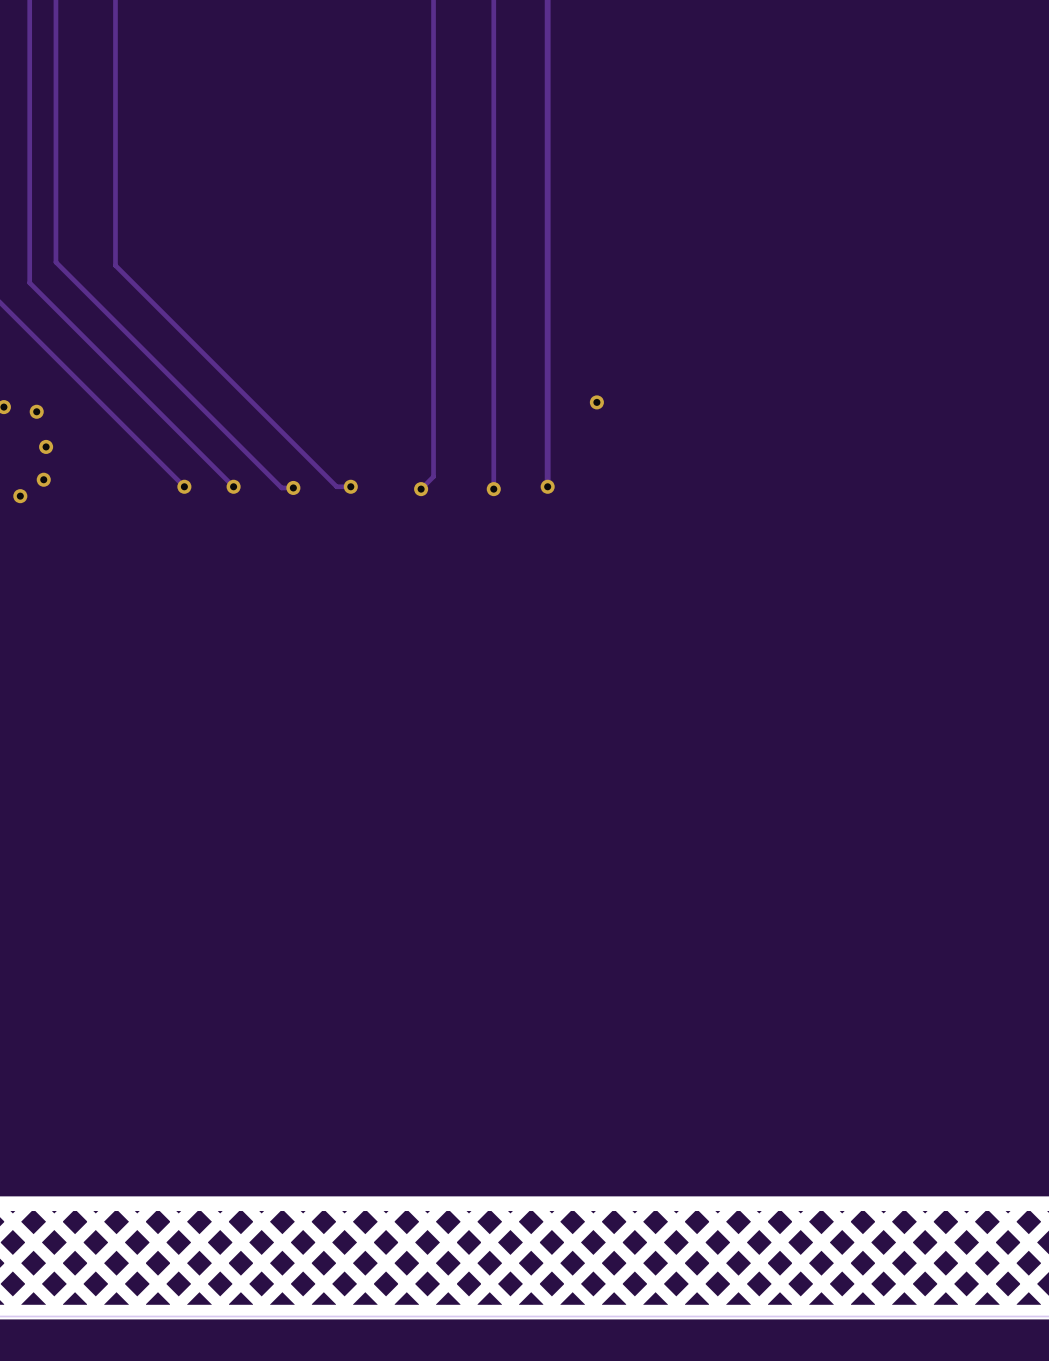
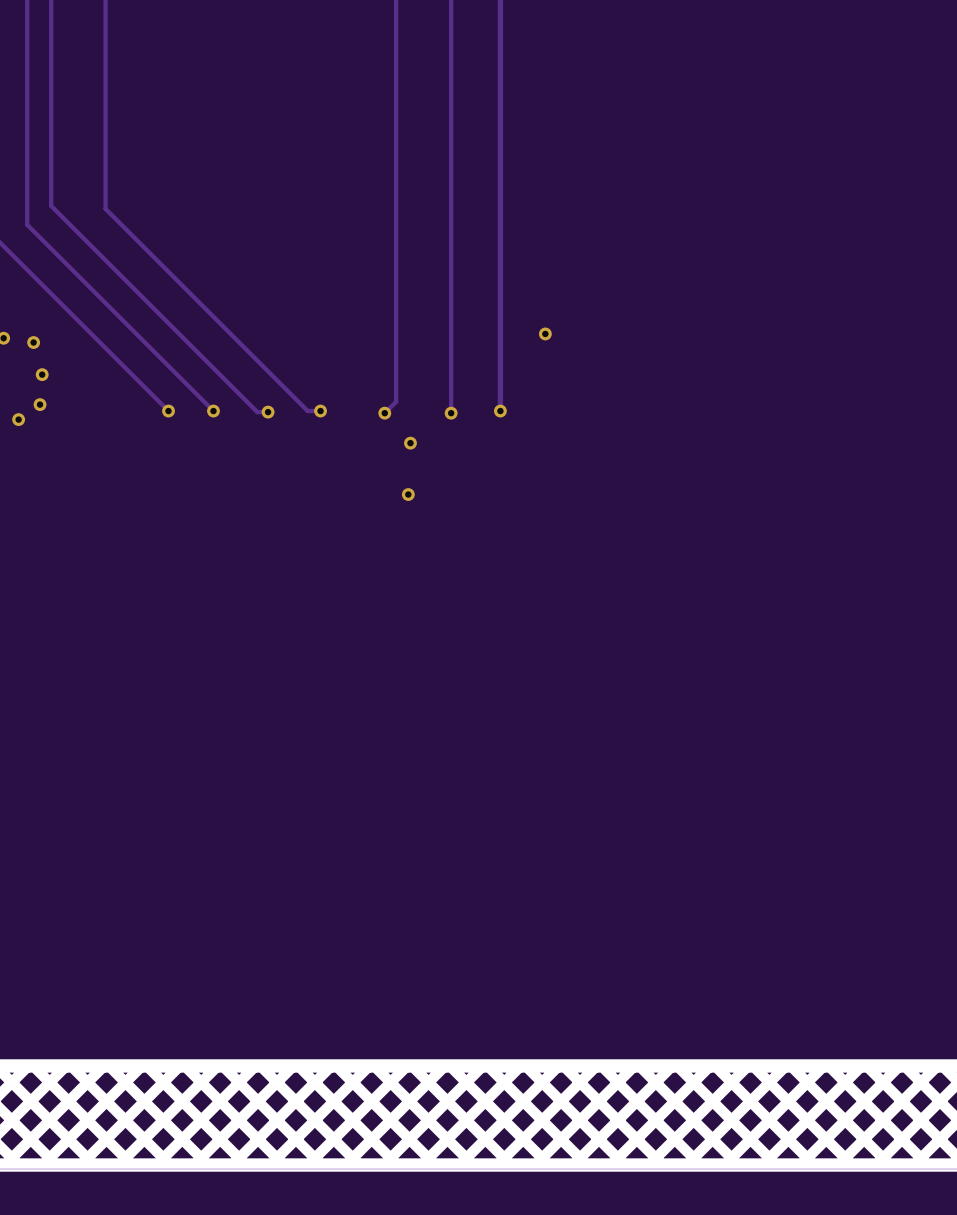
via: none -> (410, 443)
via: none -> (408, 494)

